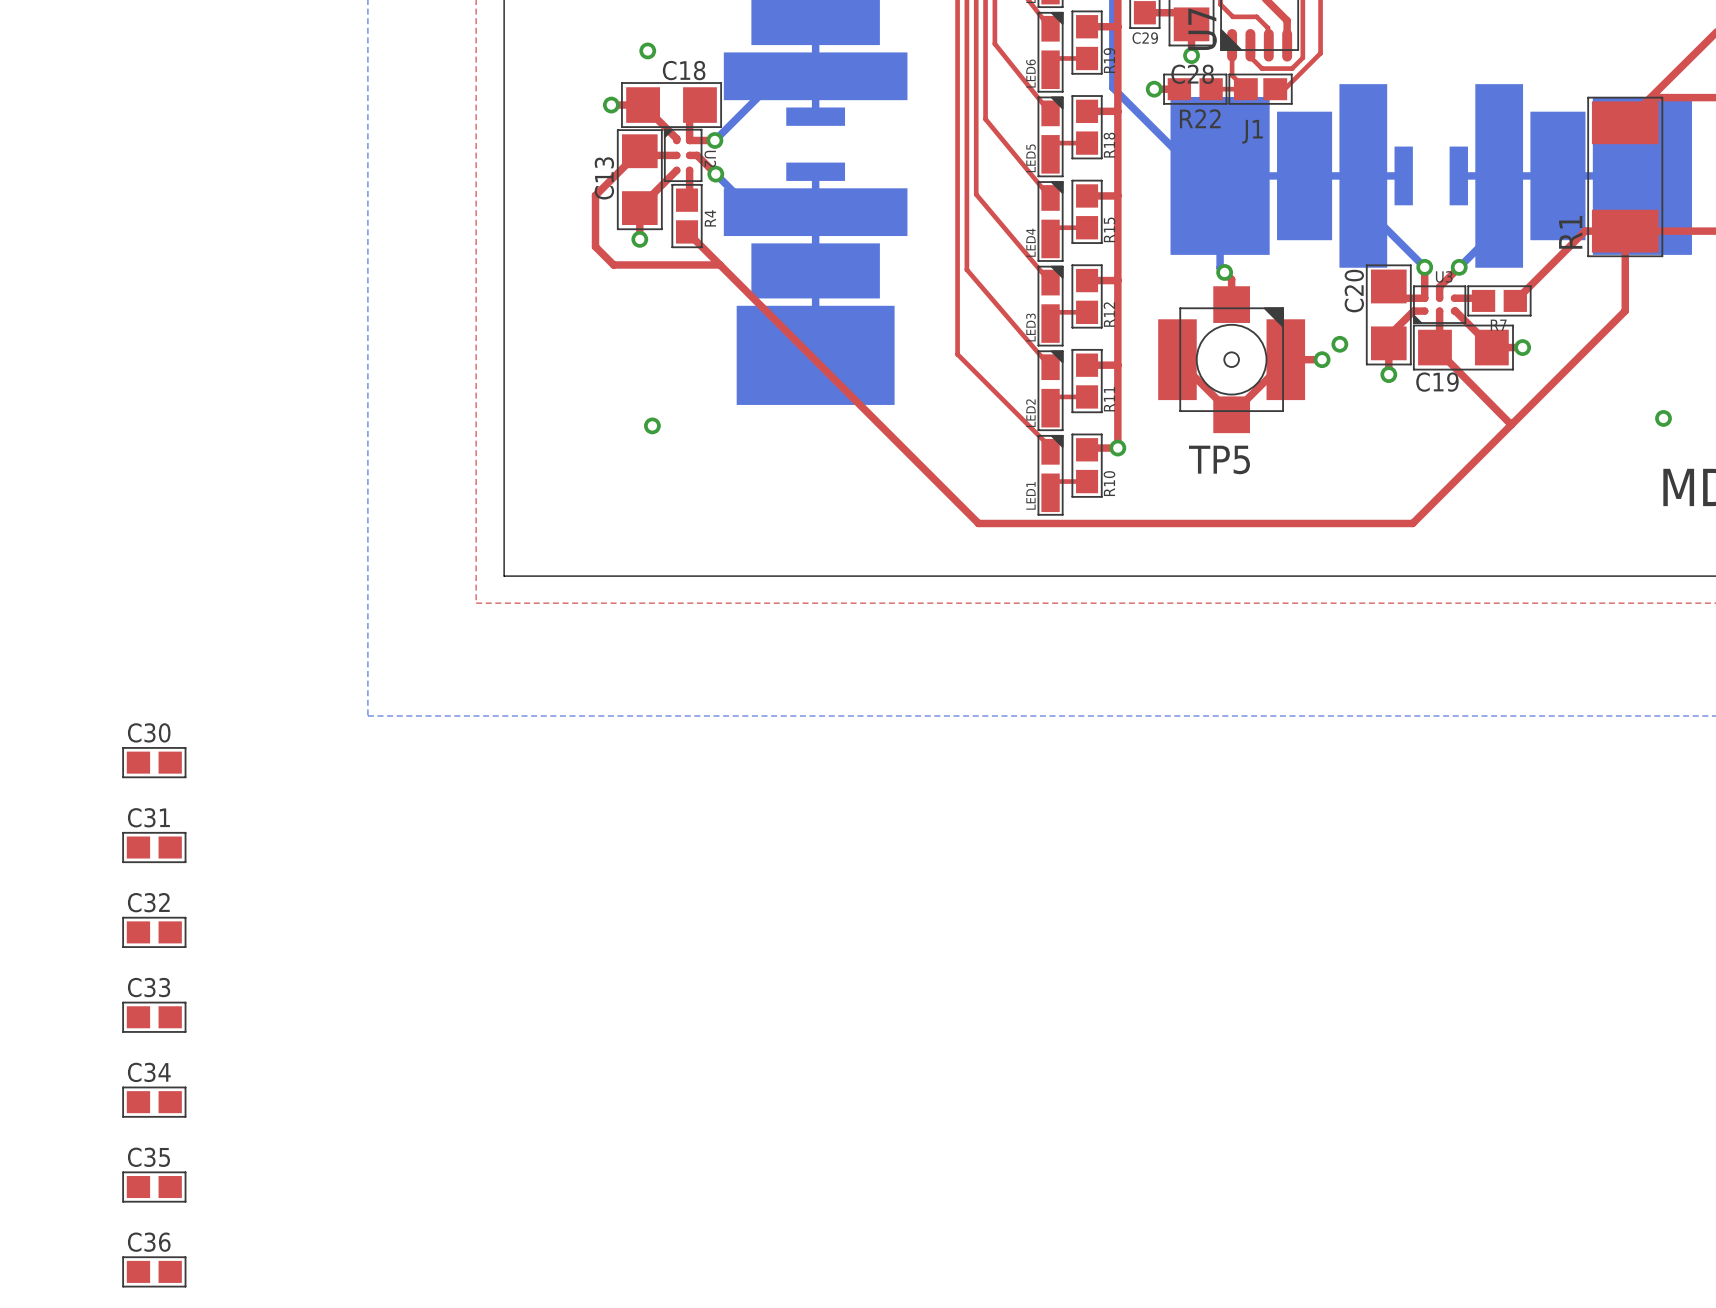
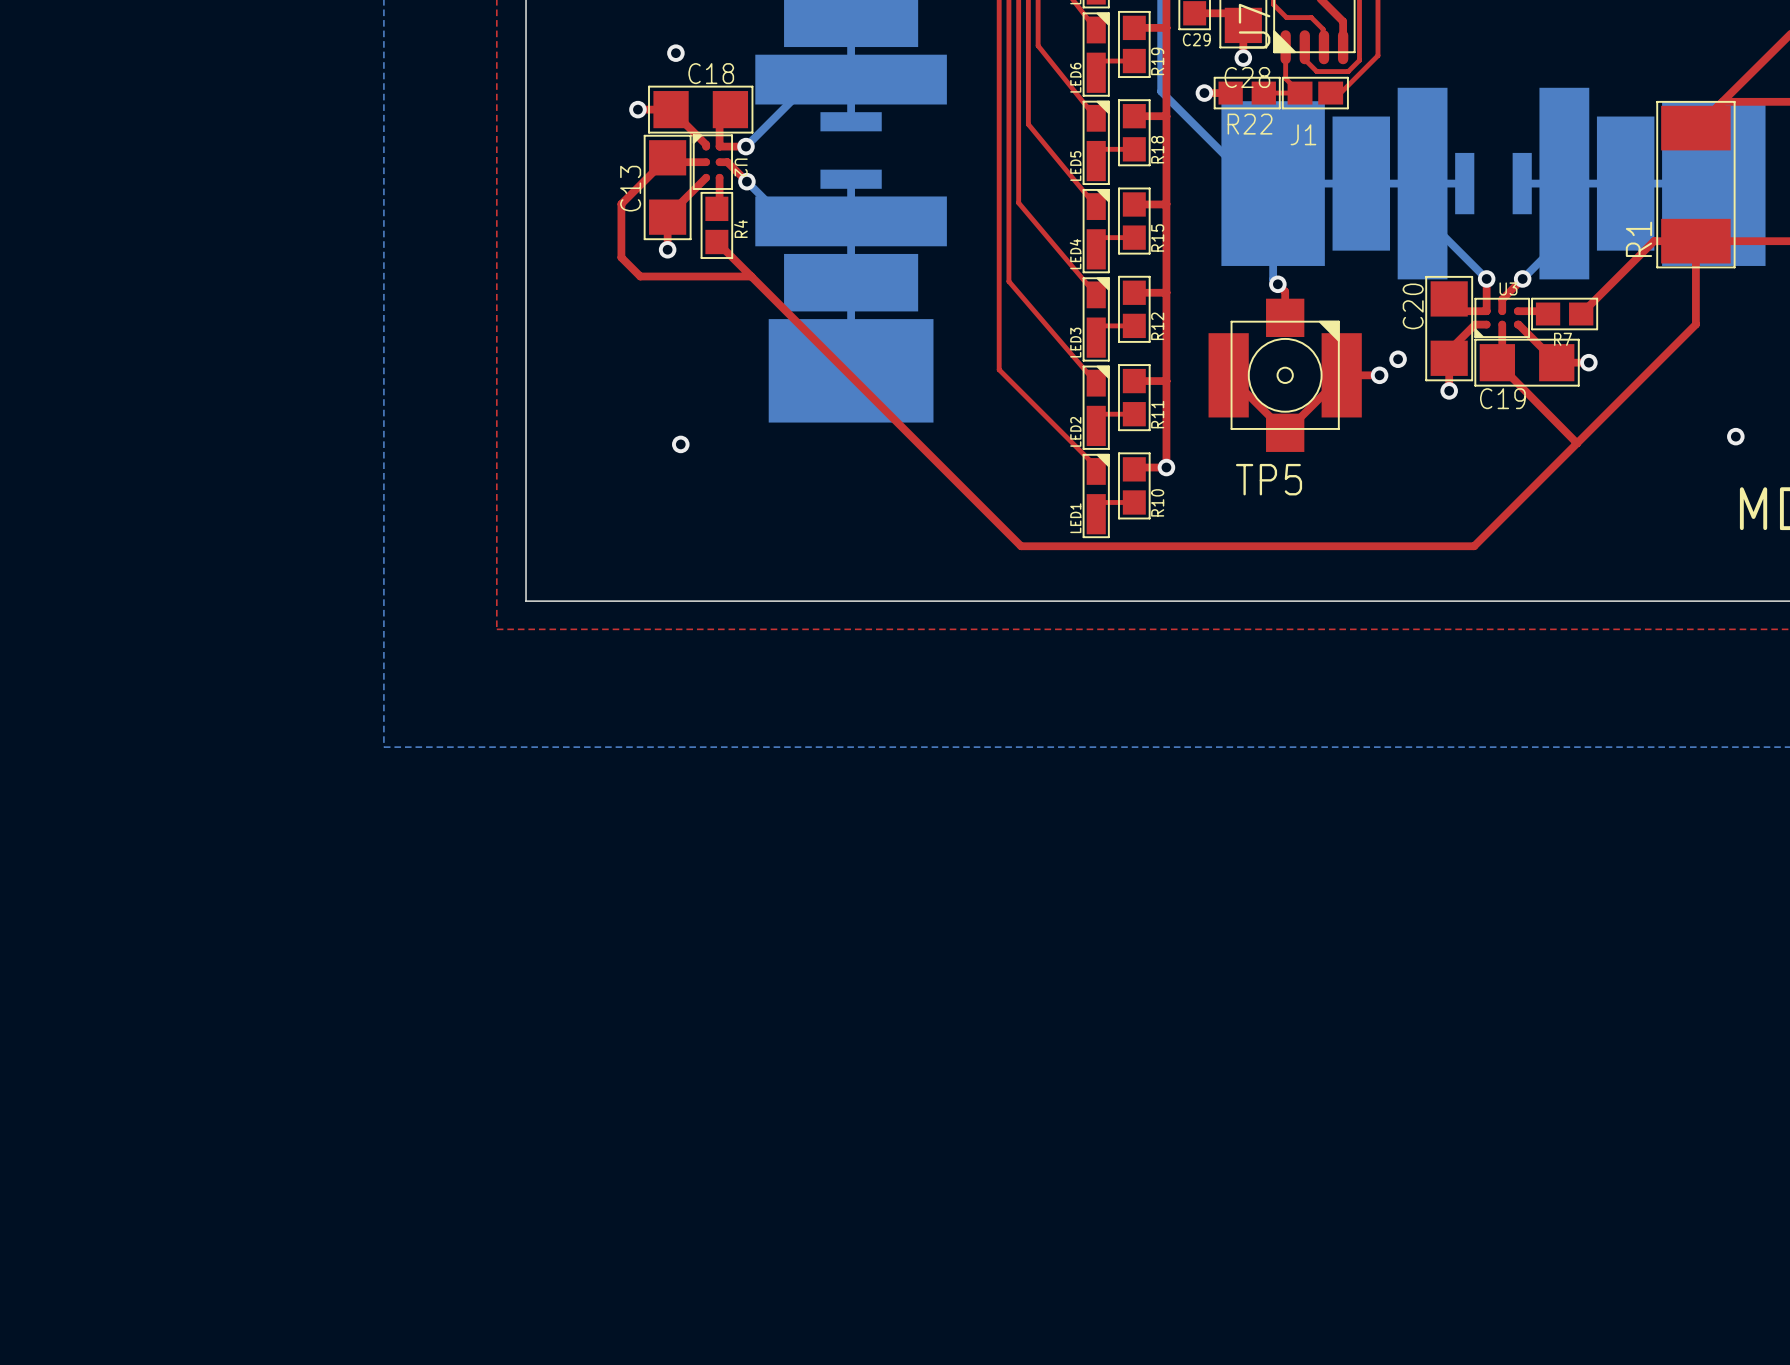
C30: (154, 762) -> none
C31: (154, 847) -> none
C32: (154, 932) -> none
C33: (154, 1017) -> none
C34: (154, 1102) -> none
C35: (154, 1187) -> none
C36: (154, 1271) -> none

